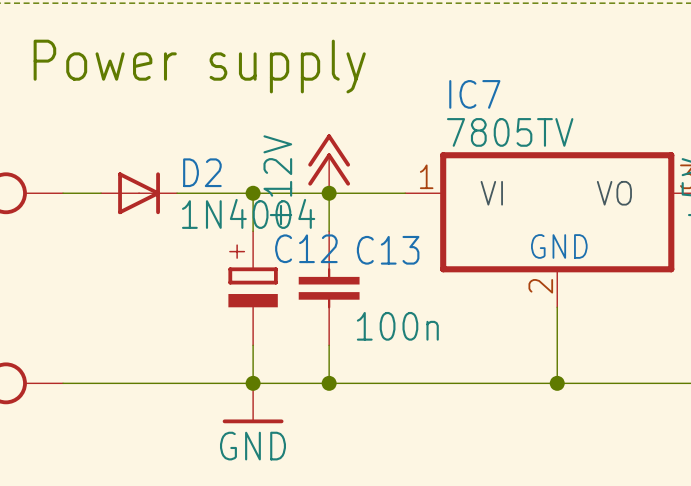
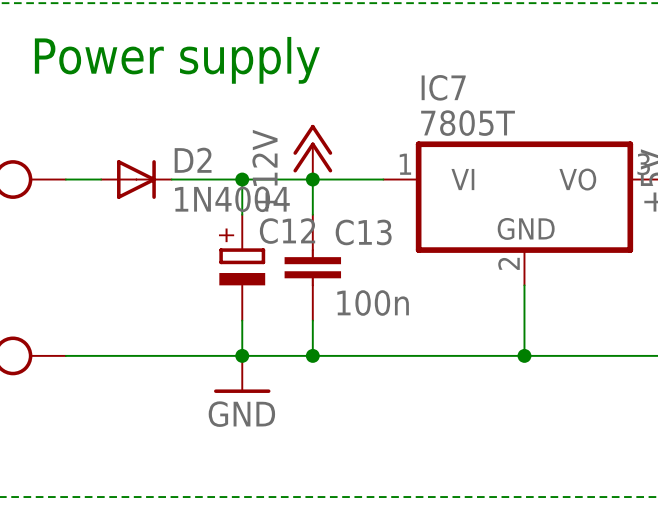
IC7 value: 7805TV (510, 132) -> 7805T (468, 123)

